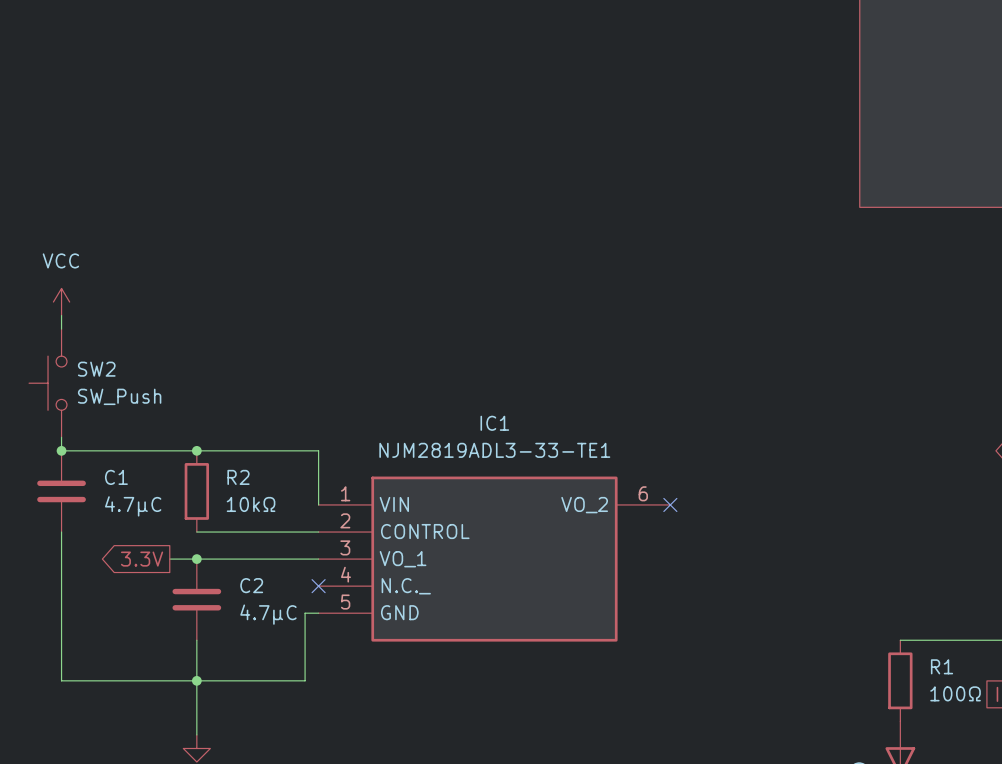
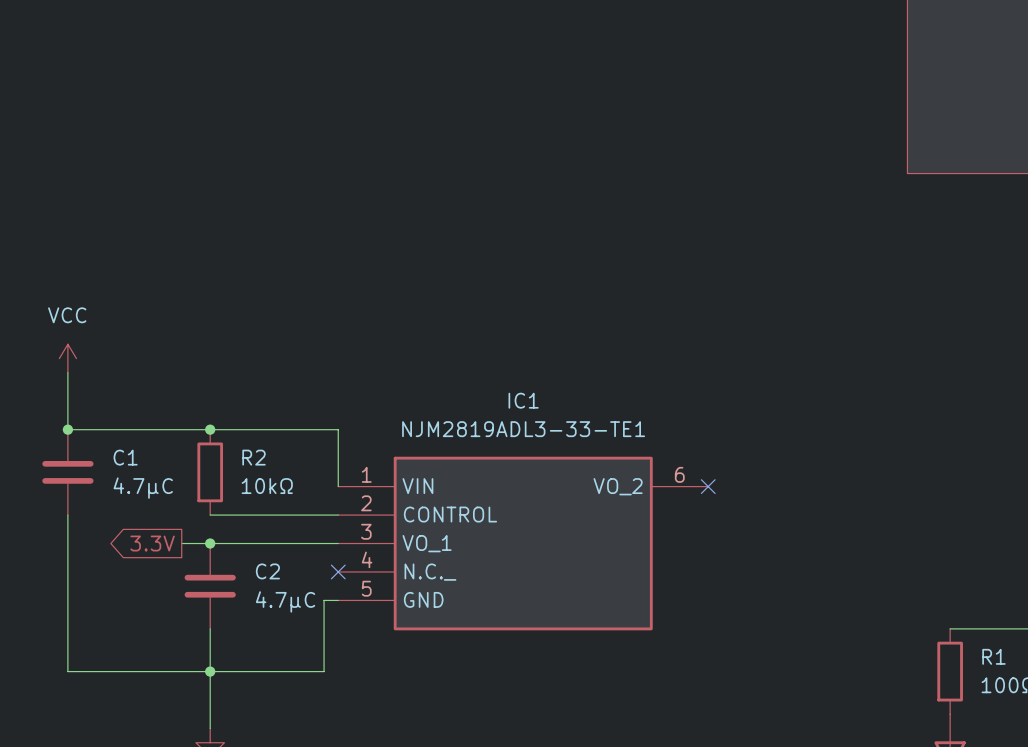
power symbol position: VCC (61, 302) -> VCC (67, 358)
wire: (61, 315) (61, 329) -> none
SW2: SW_Push (48, 383) -> none

